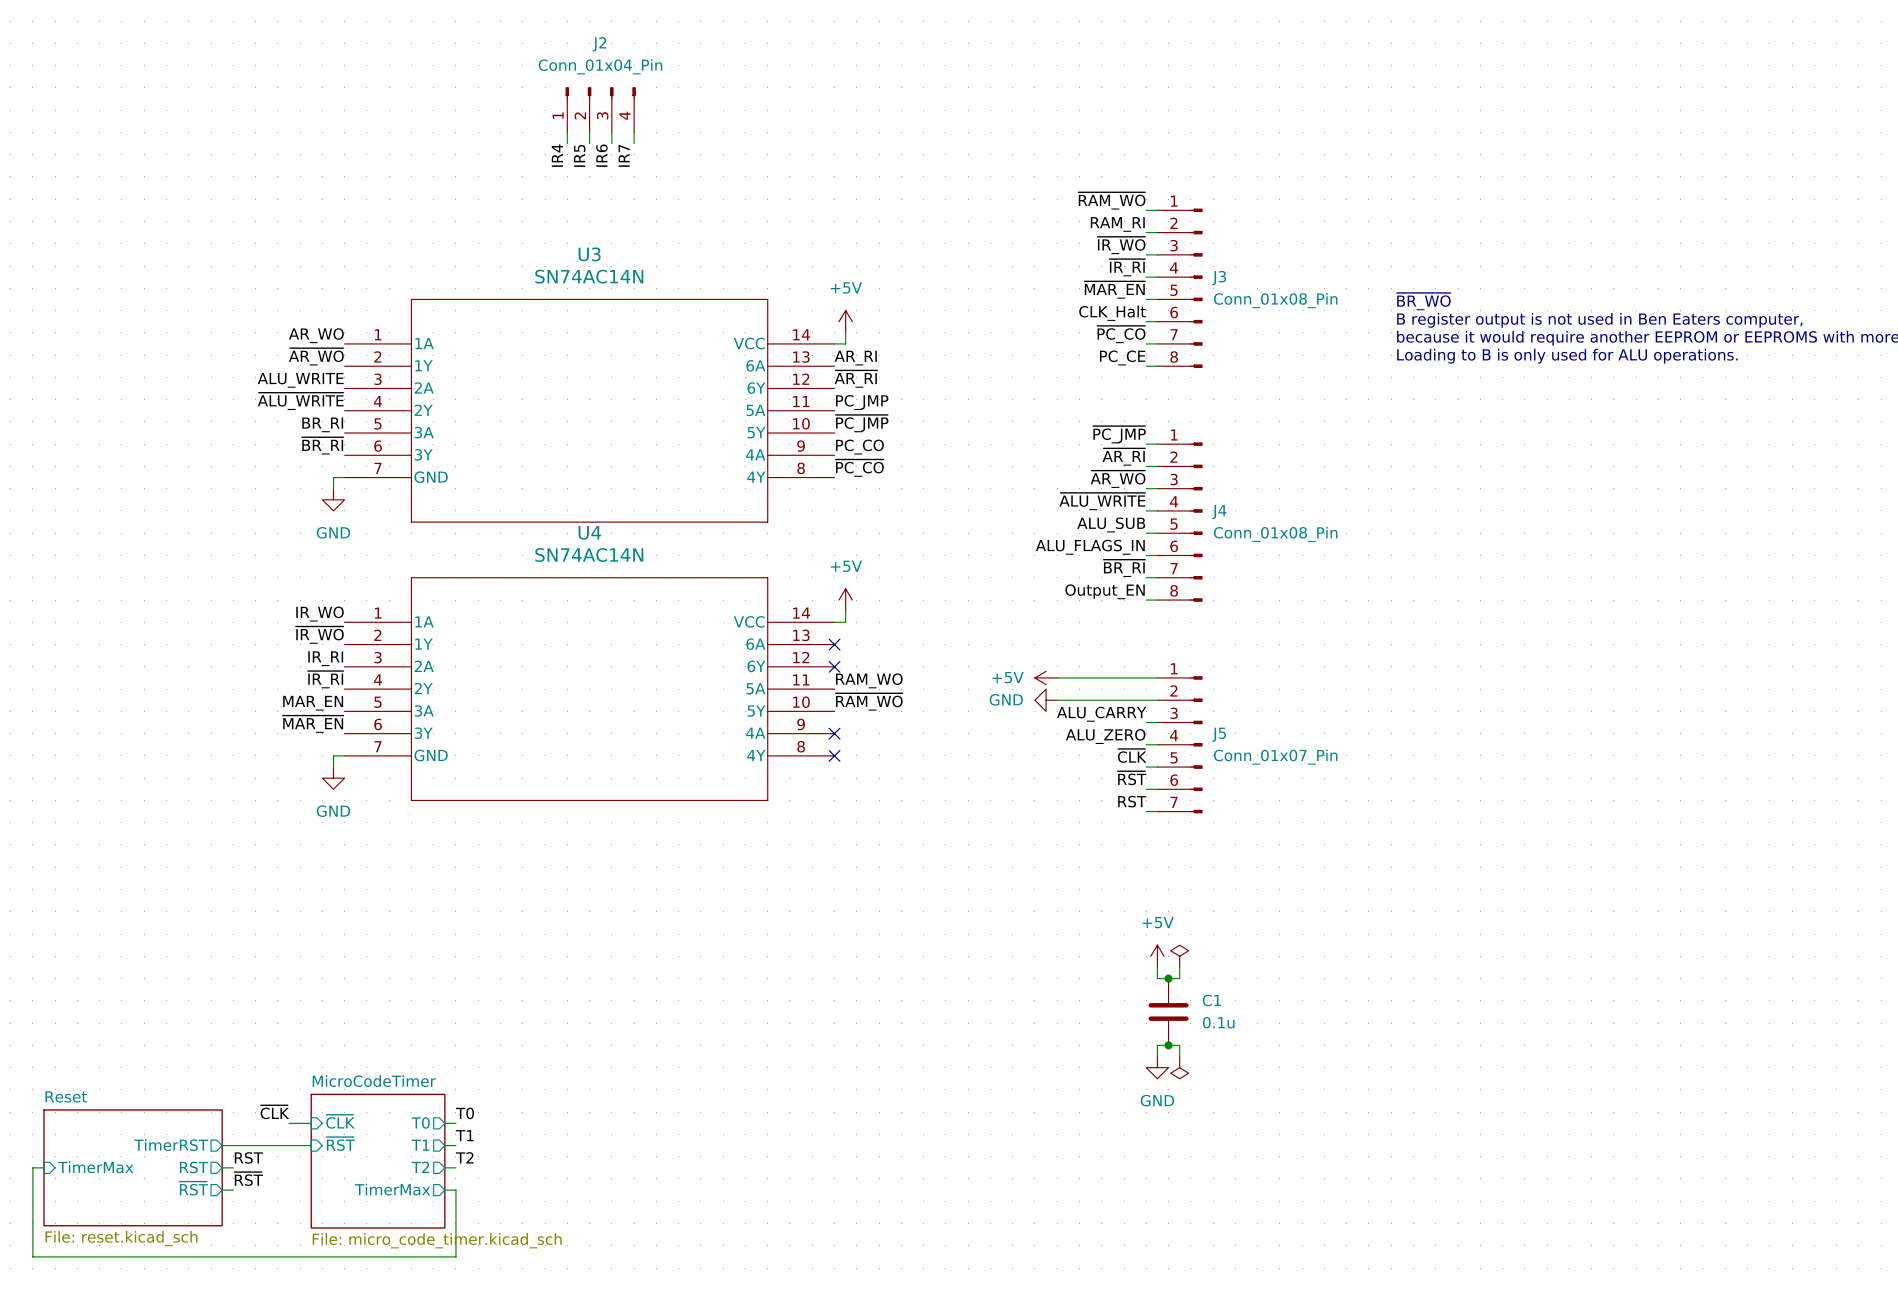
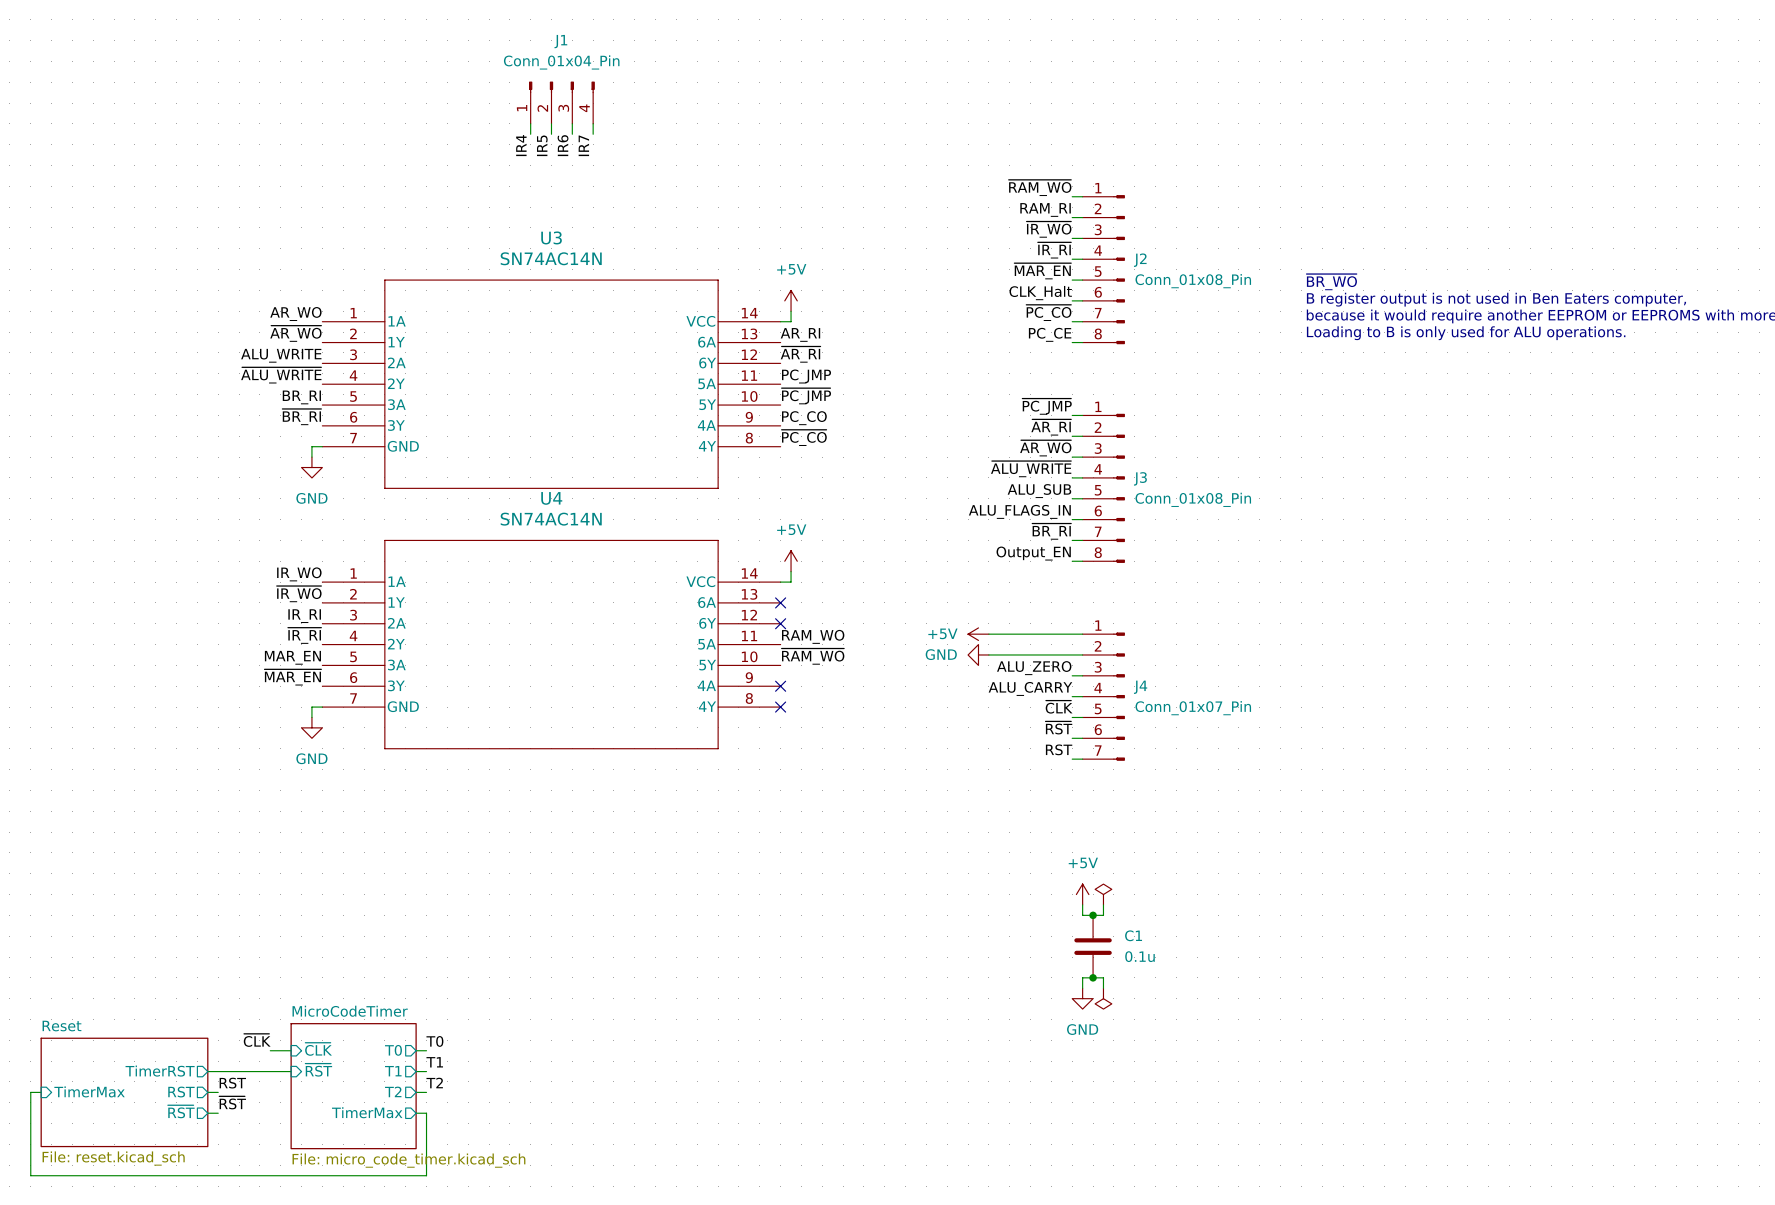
J2 name: J2 (599, 44) -> J1 (560, 41)
J3 name: J3 (1219, 278) -> J2 (1140, 260)
J4 name: J4 (1219, 512) -> J3 (1140, 478)
label: ALU_CARRY (1101, 714) -> ALU_ZERO (1034, 668)
J5 name: J5 (1219, 734) -> J4 (1140, 687)
label: ALU_ZERO (1105, 736) -> ALU_CARRY (1030, 688)

